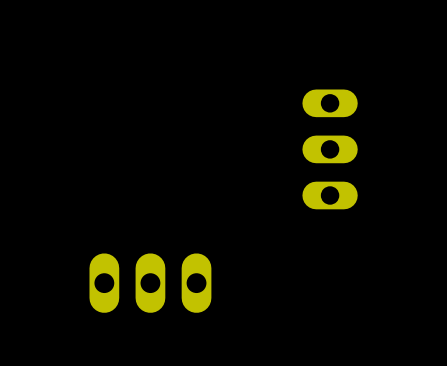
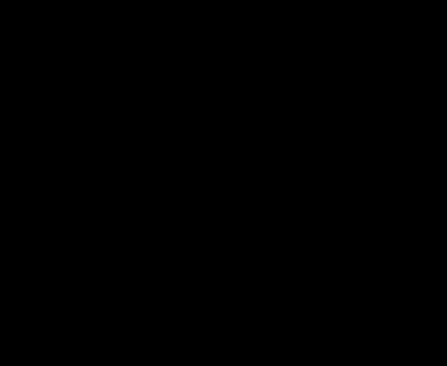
part: (330, 149) -> none
part: (150, 283) -> none

